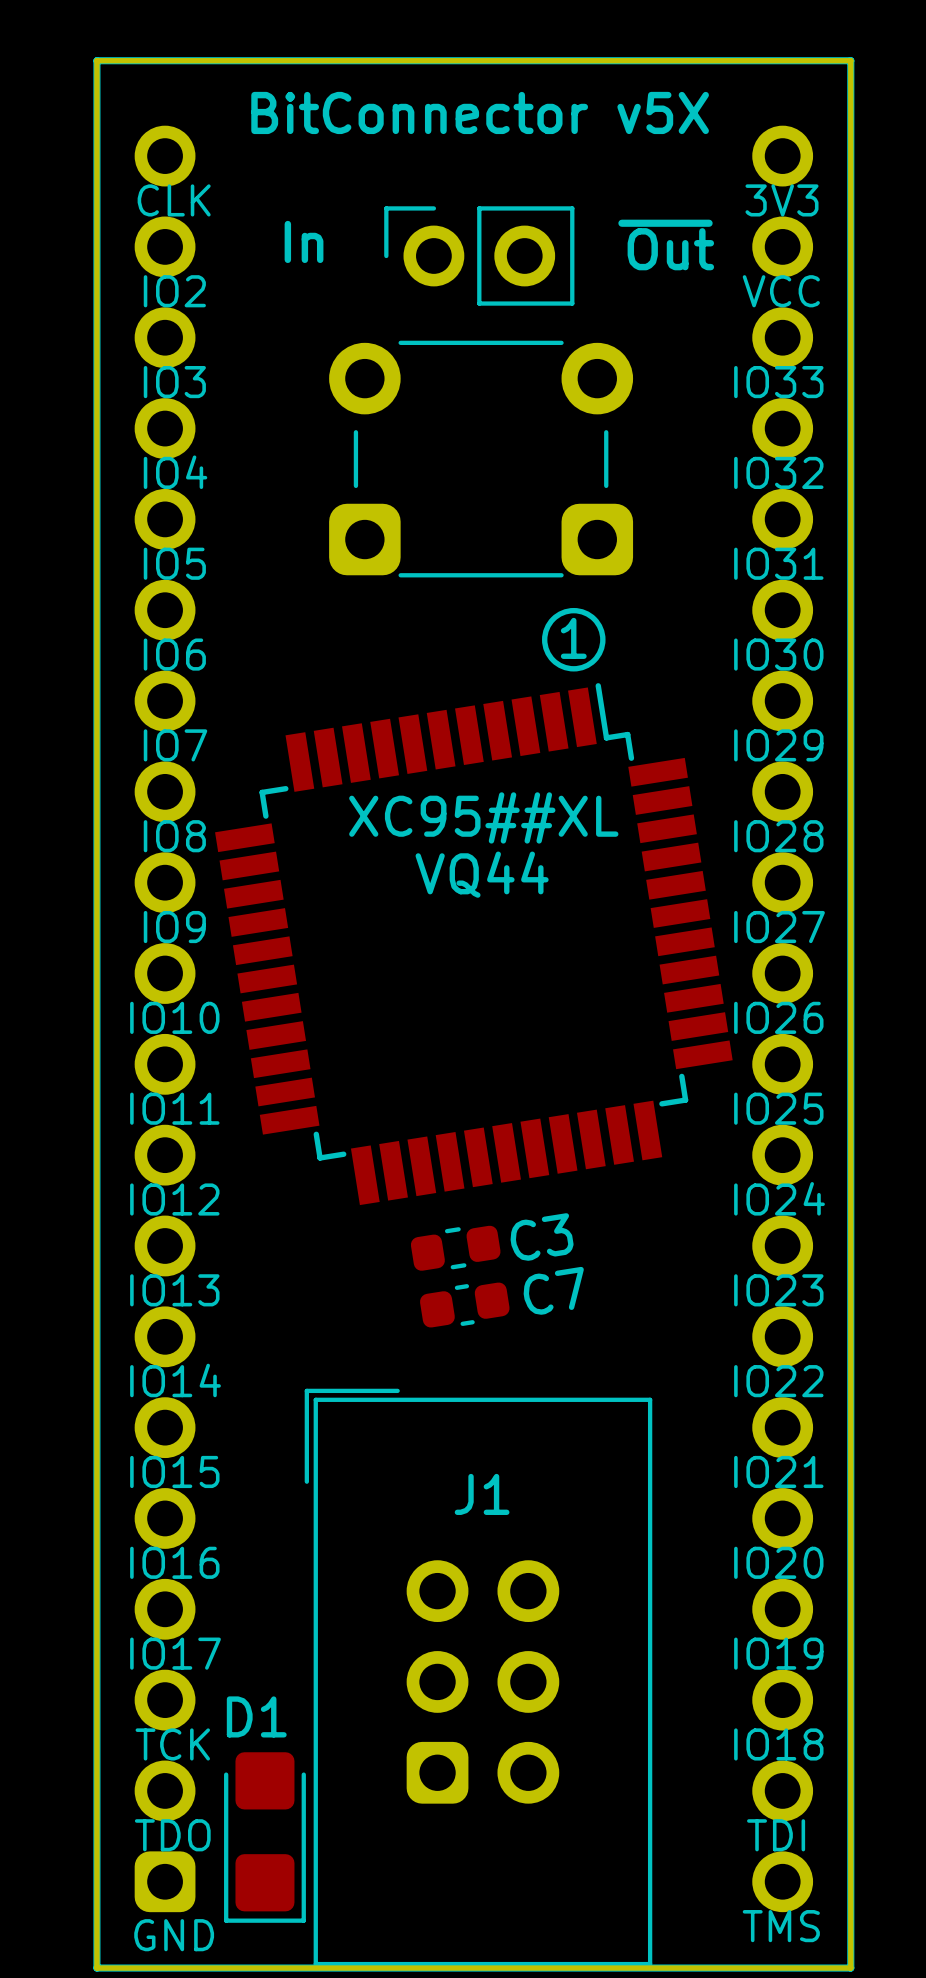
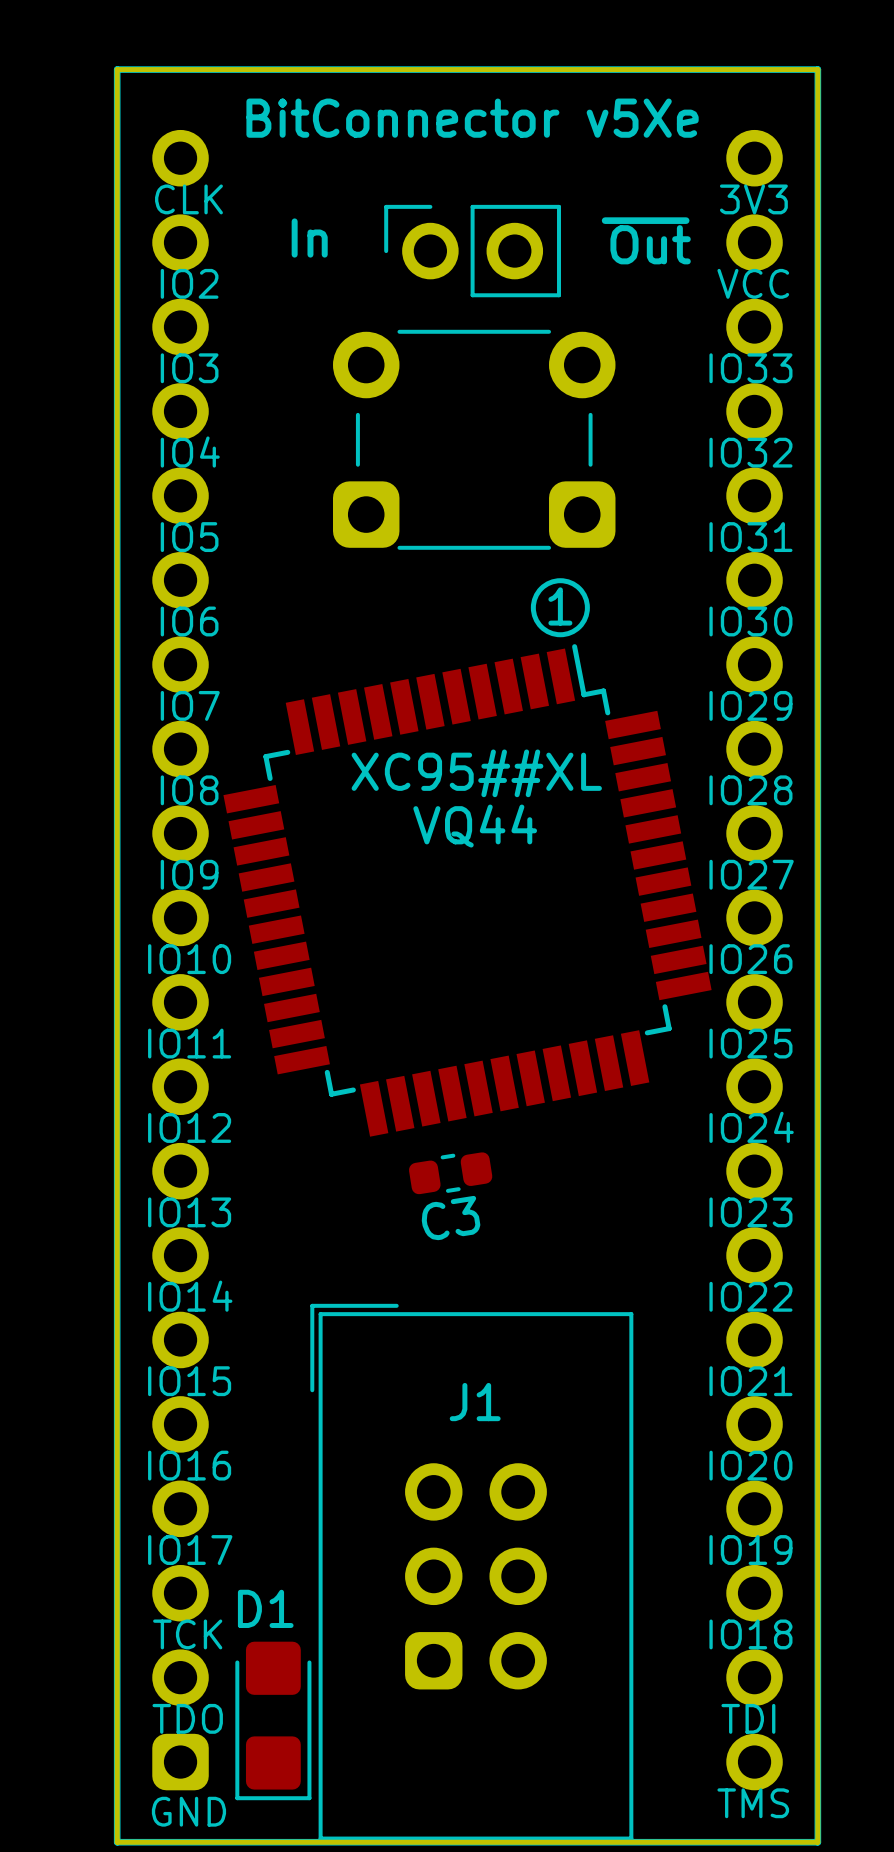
text: BitConnector v5X (480, 112) -> BitConnector v5Xe (472, 118)
part rotation: 0° (473, 944) -> 2° counterclockwise (467, 890)
C3 name position: C3 (542, 1236) -> C3 (451, 1218)
C7: (464, 1305) -> none

